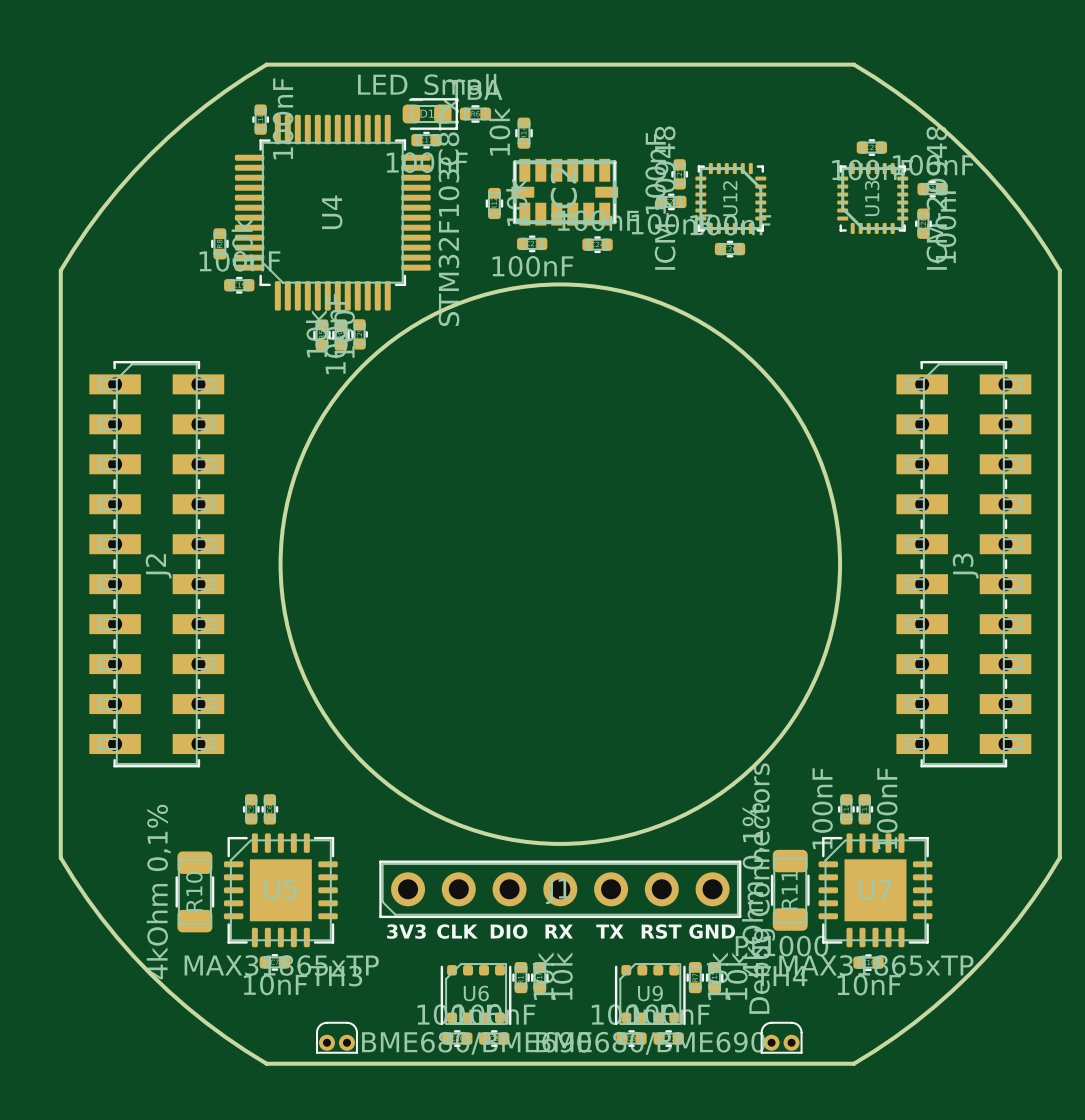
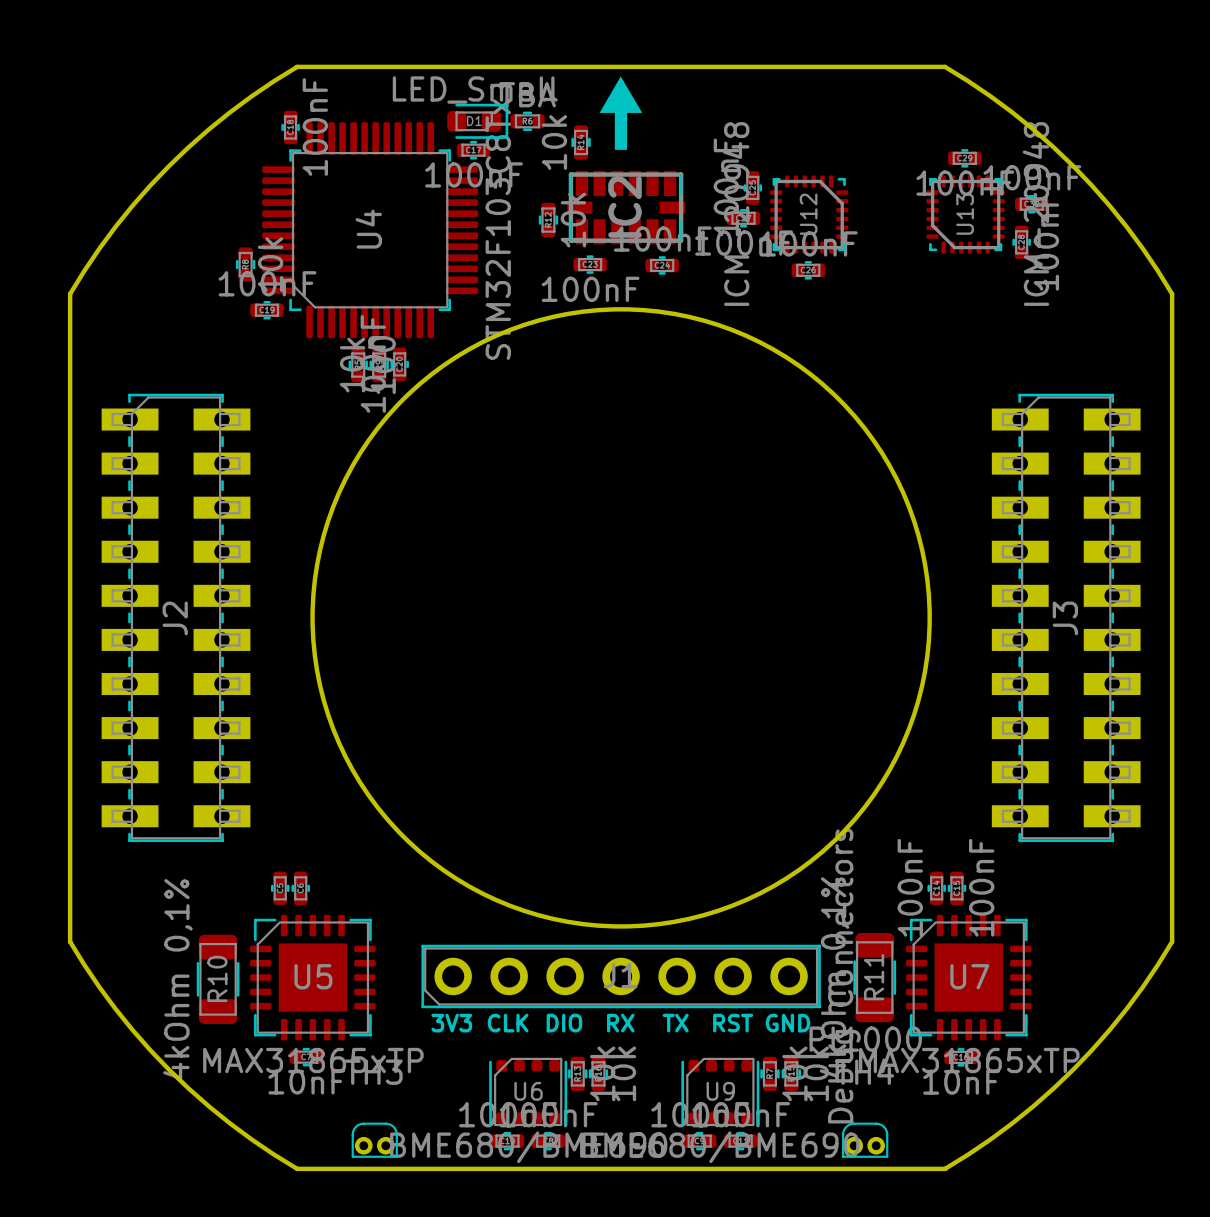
drawing: none -> [599, 76, 643, 150]

